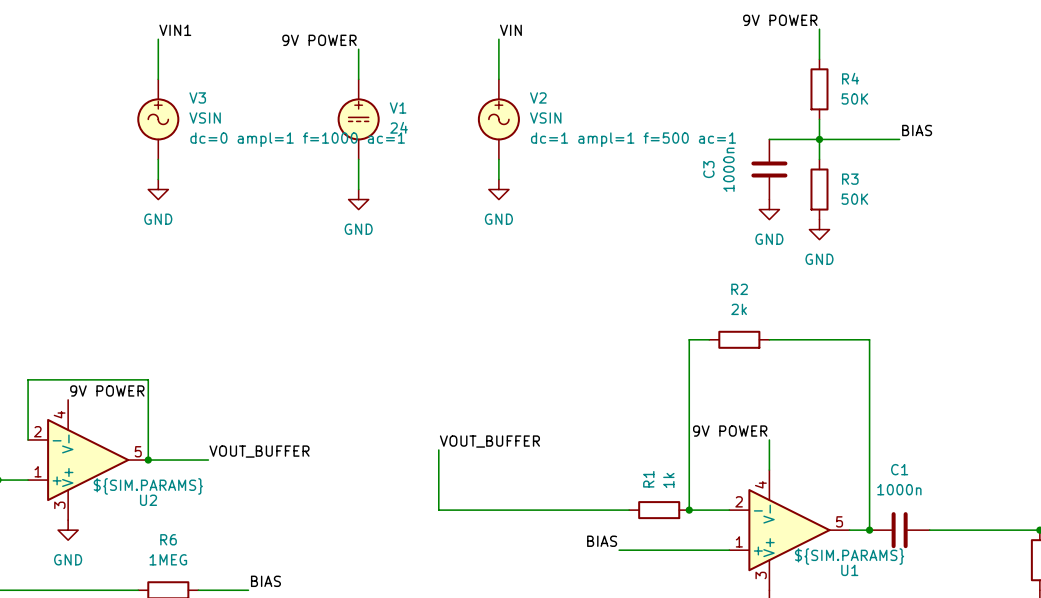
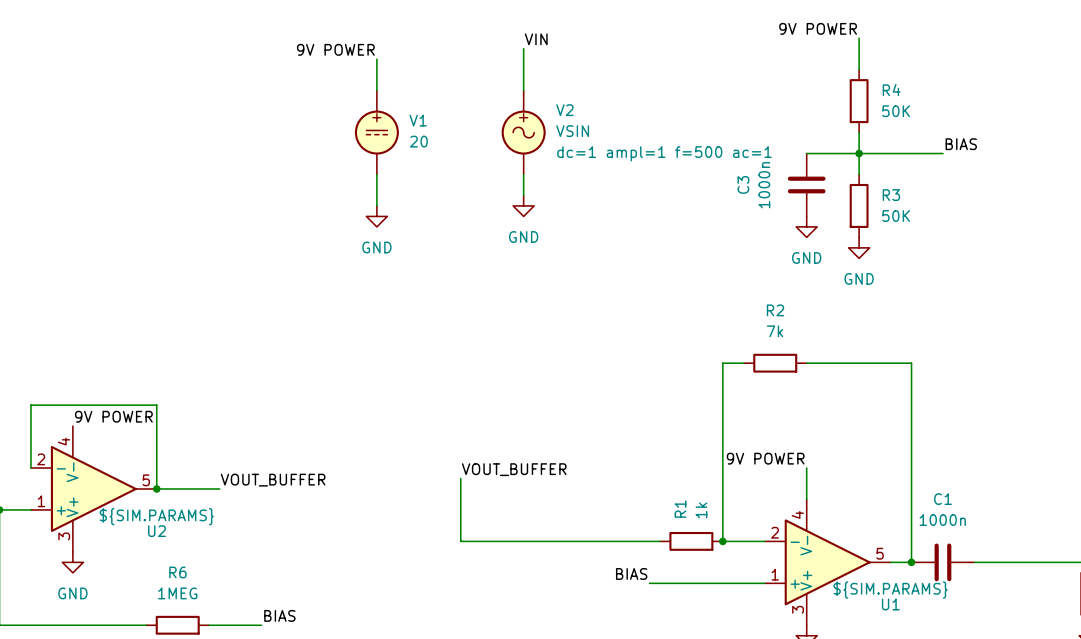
label: VIN1 (175, 30) -> none
wire: (158, 39) (158, 79) -> none
V3: VSIN (158, 119) -> none
V1 value: 24 (399, 127) -> 20 (418, 141)
wire: (158, 159) (158, 179) -> none
power symbol: GND (158, 189) -> none
R2 value: 2k (739, 309) -> 7k (774, 331)

